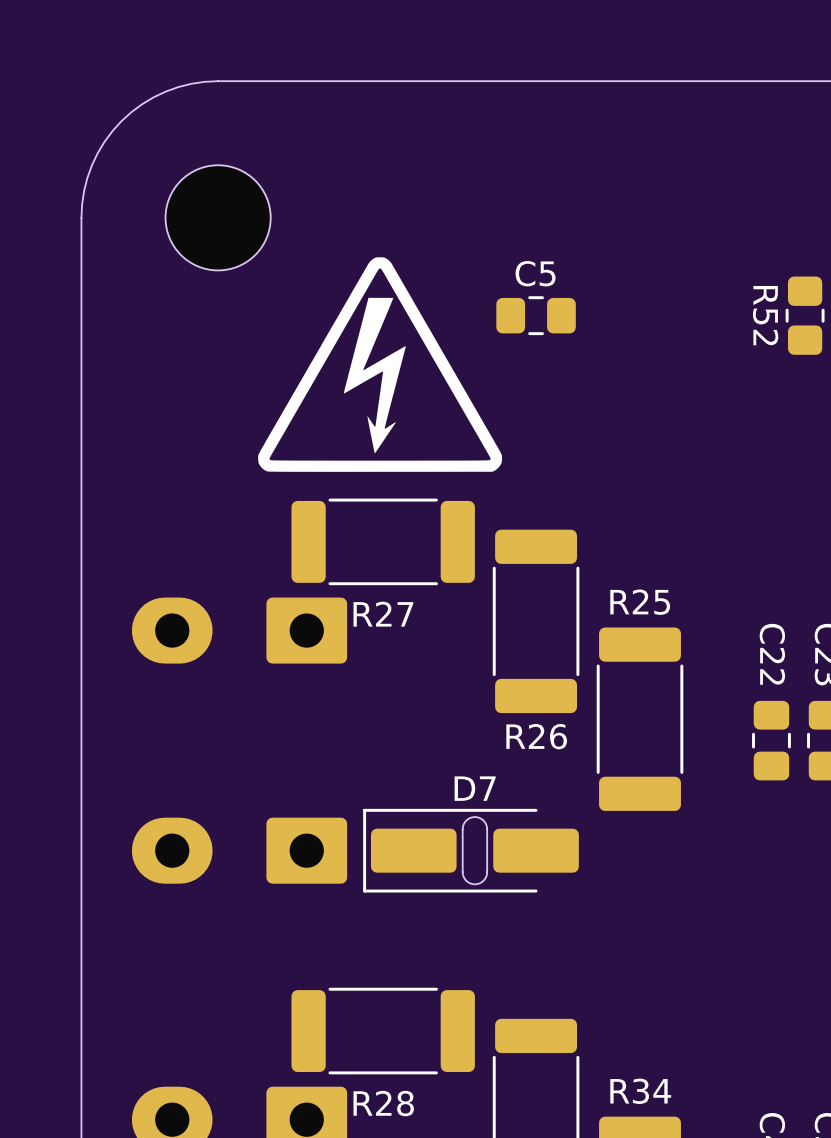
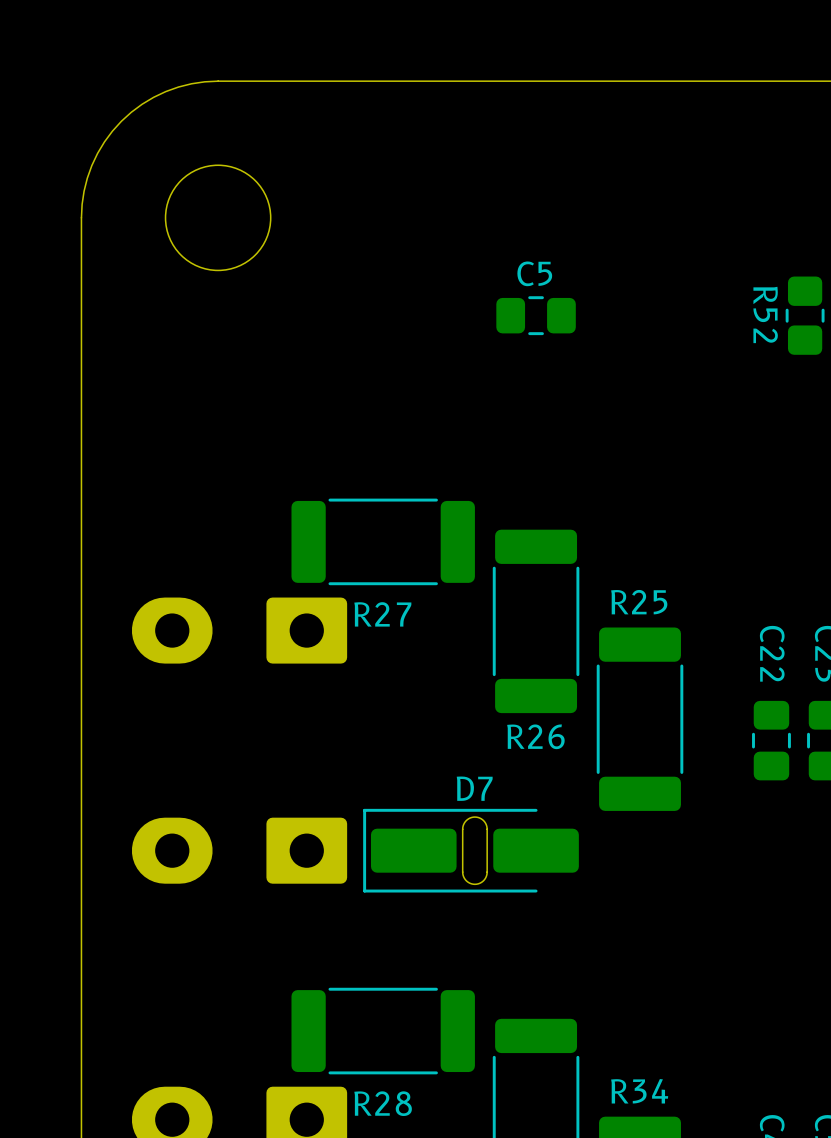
drawing: [258, 257, 503, 472] -> none

